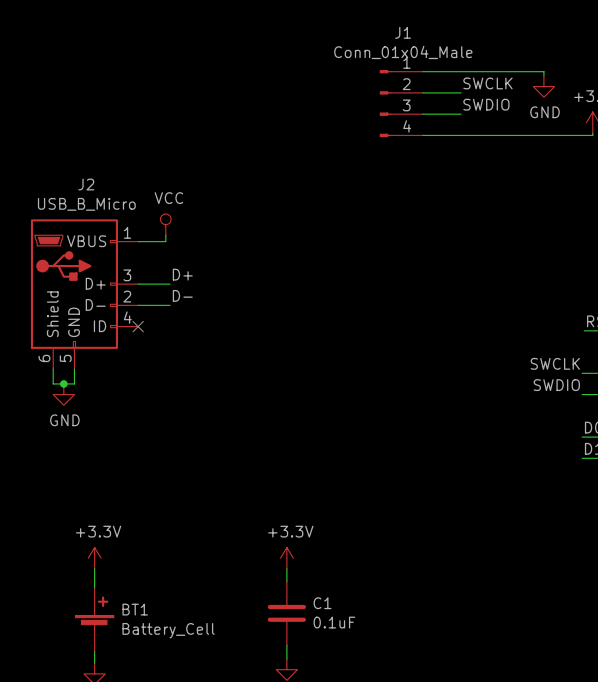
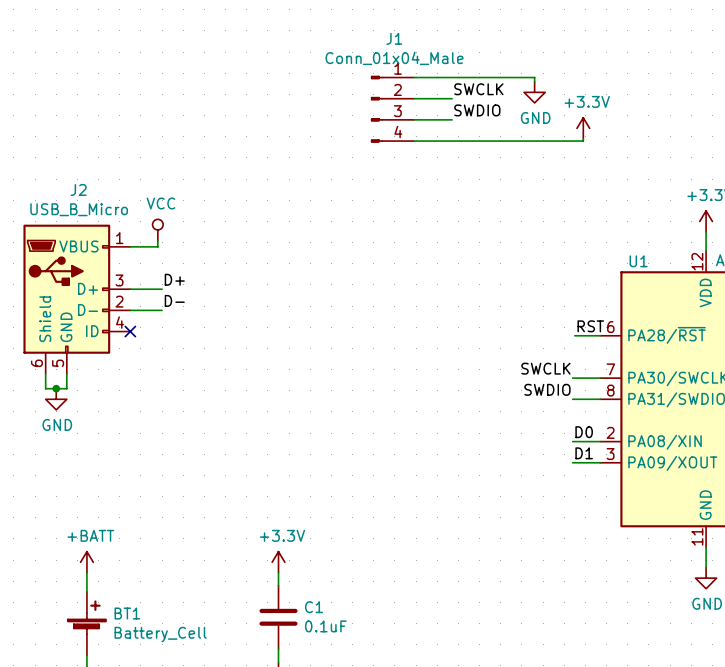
power symbol: +3.3V (94, 558) -> +BATT (86, 562)

